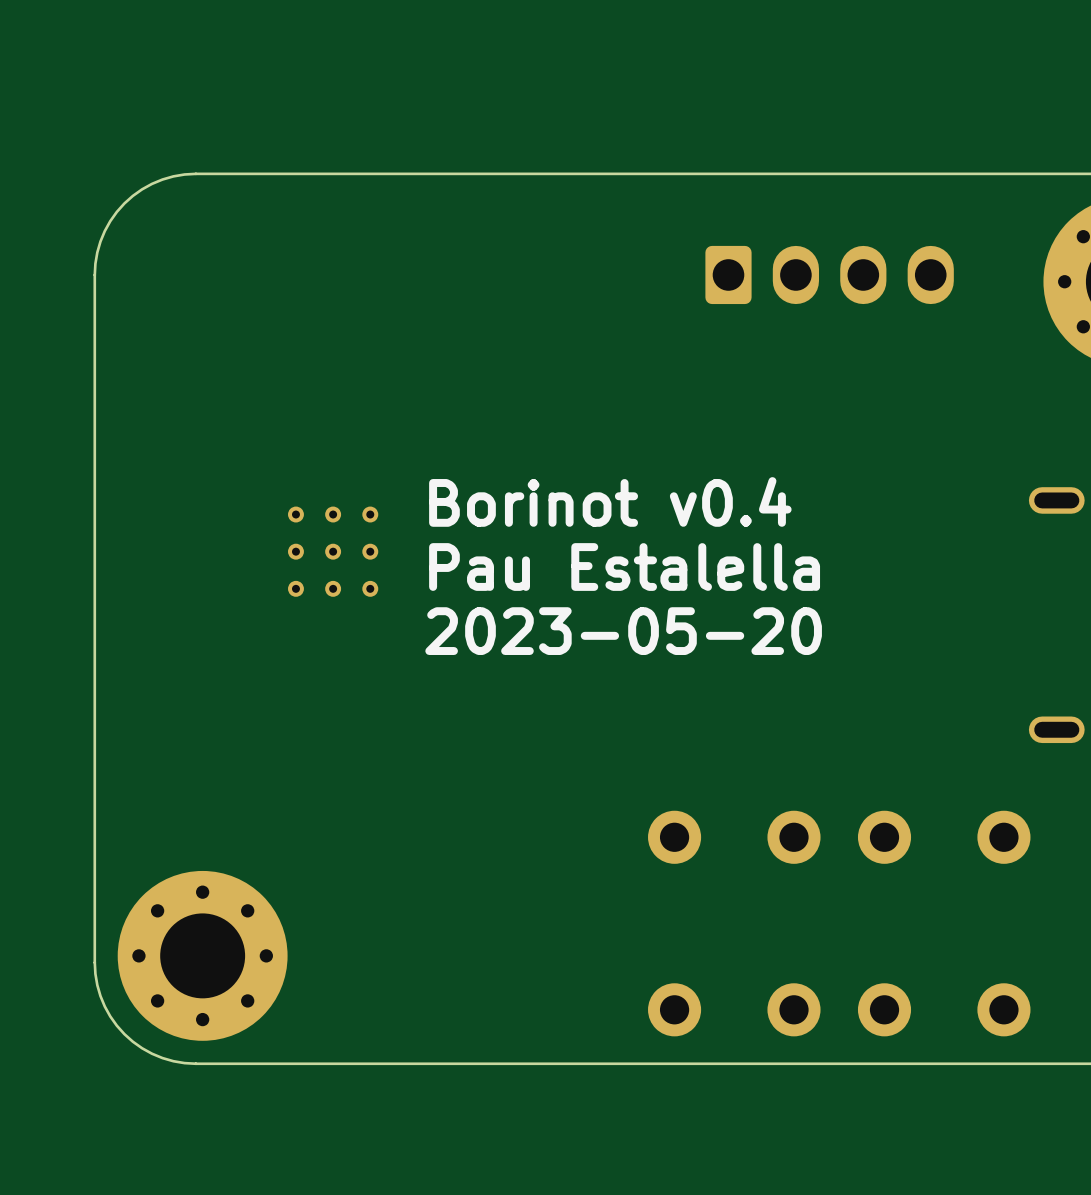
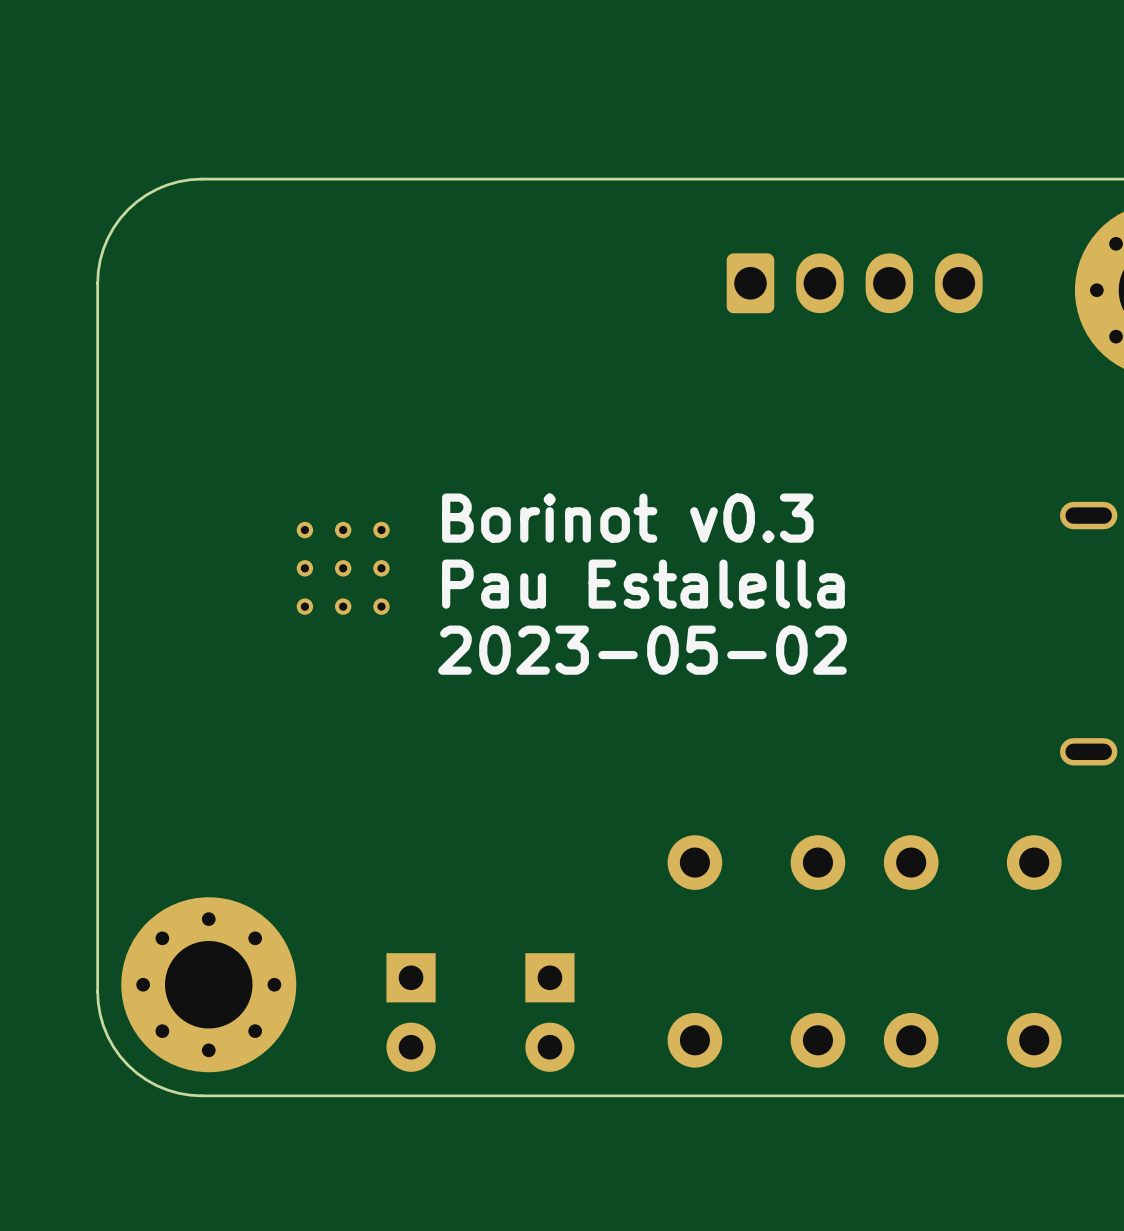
text: Borinot v0.4 (610, 501) -> Borinot v0.3 (627, 518)
text: 2023-05-20 (623, 631) -> 2023-05-02 (642, 650)
part: none -> (411, 1012)
part: none -> (549, 1012)

